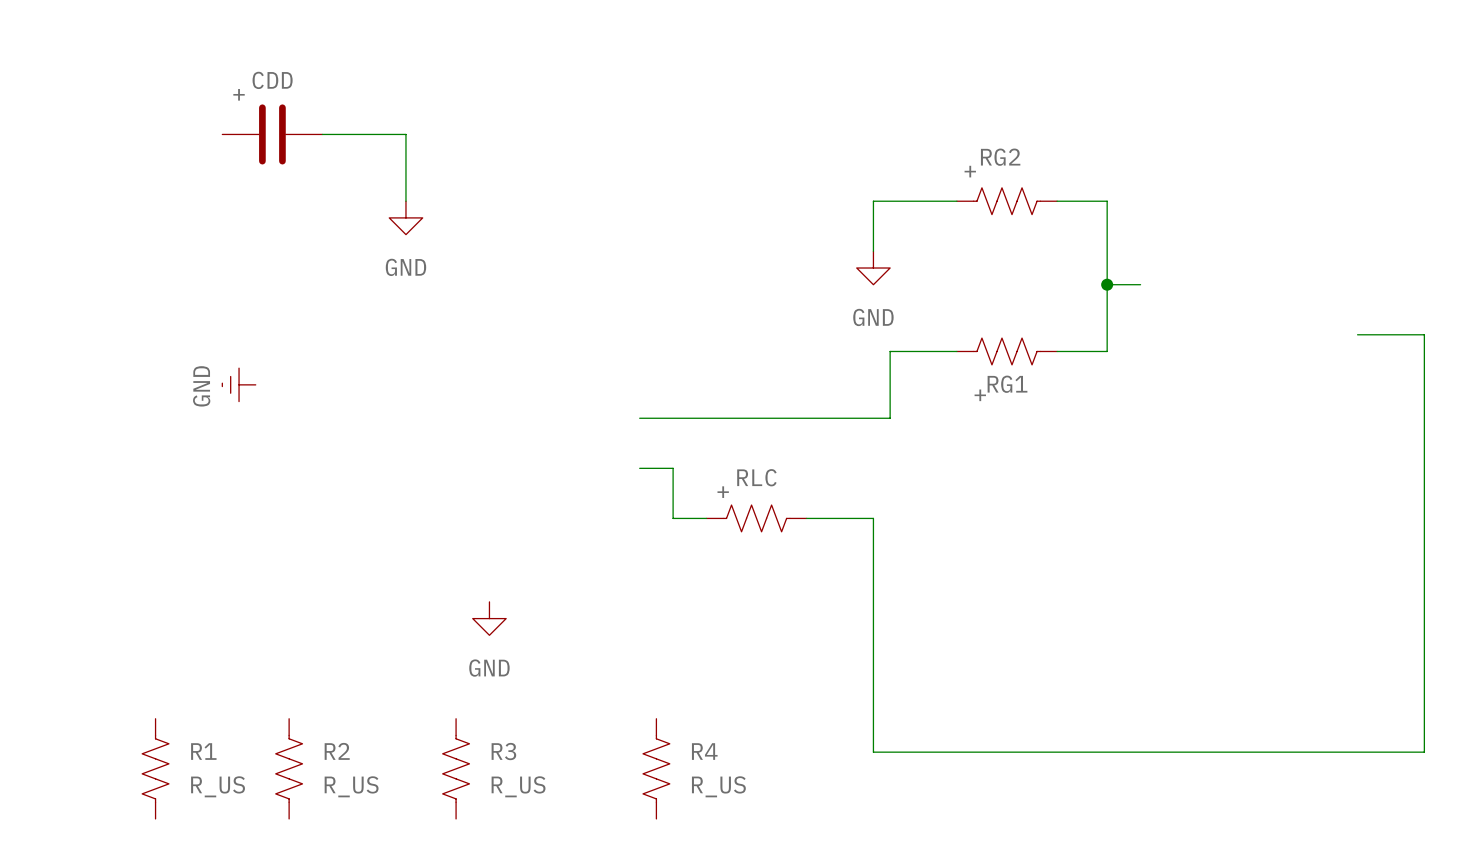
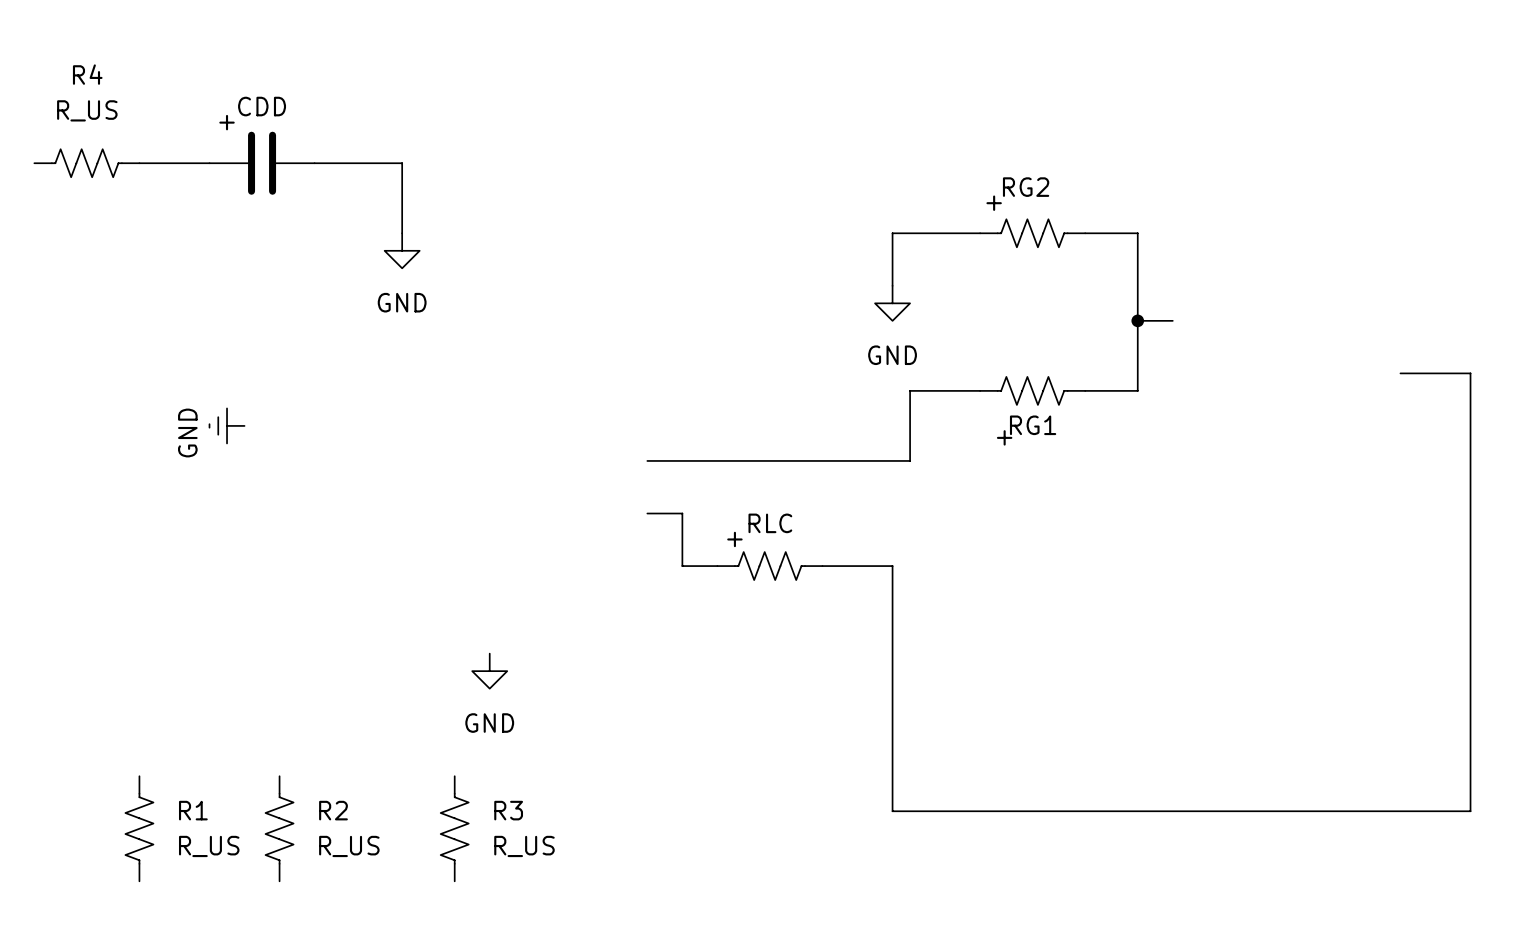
wire: none -> (139, 163) (209, 163)
R4 name position: R4 (704, 751) -> R4 (87, 74)
R4 rotation: 0° (656, 768) -> 90° clockwise (86, 163)
R4 position: (656, 768) -> (86, 163)
R4 value position: R_US (718, 786) -> R_US (87, 110)

